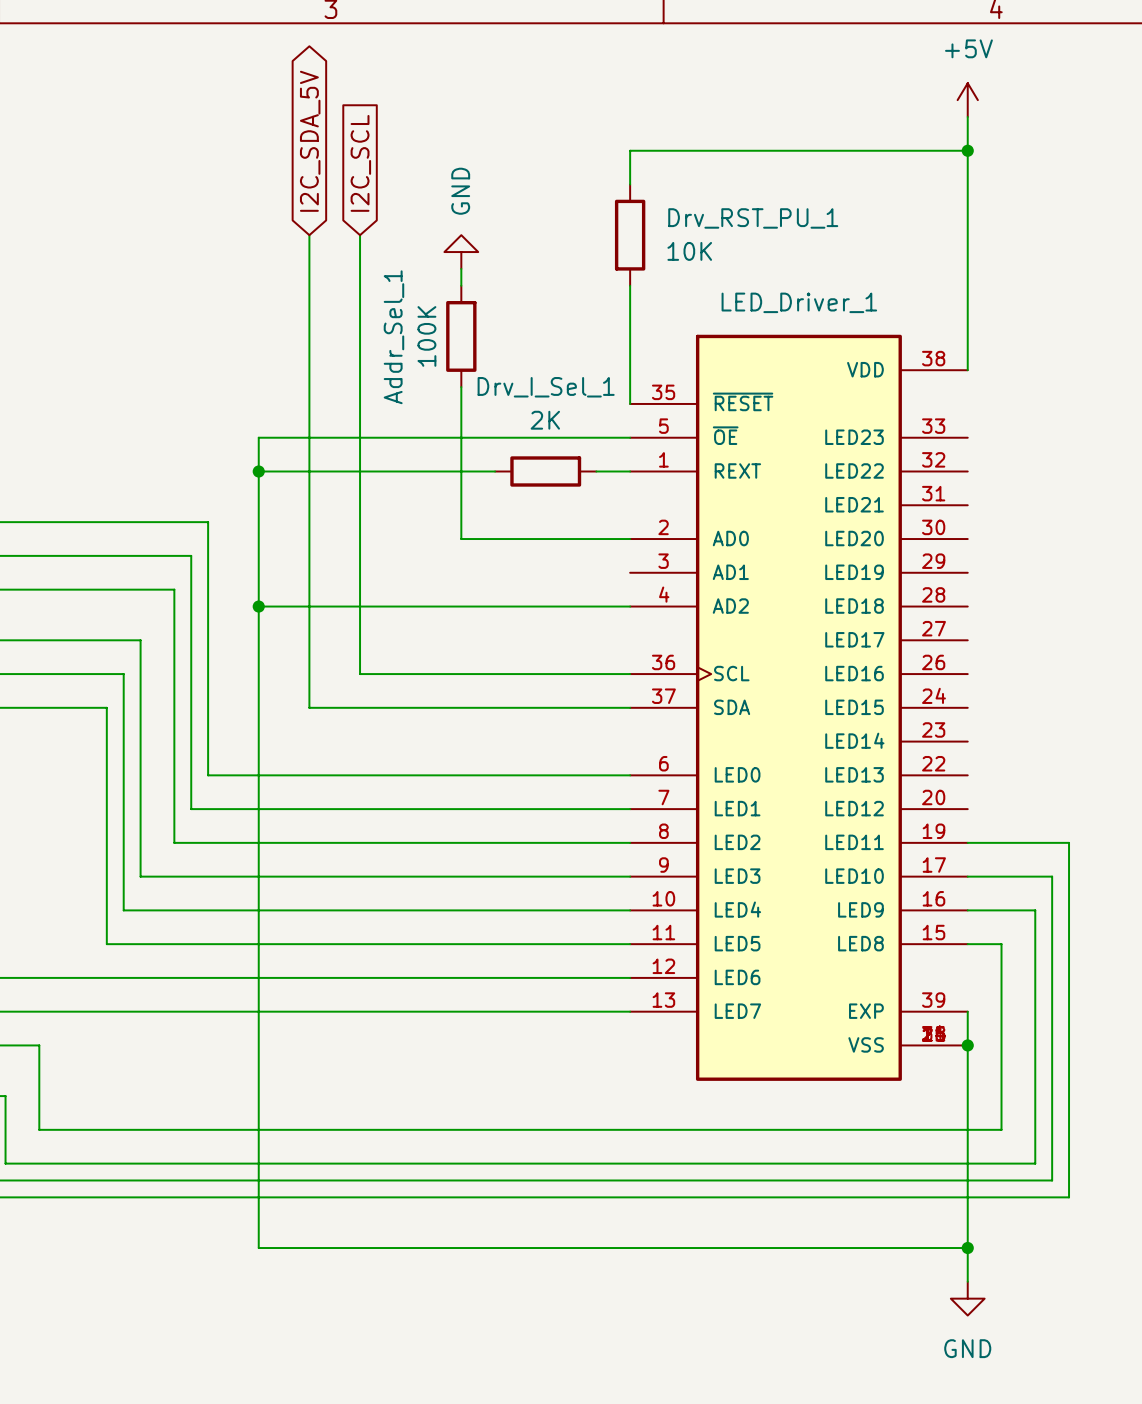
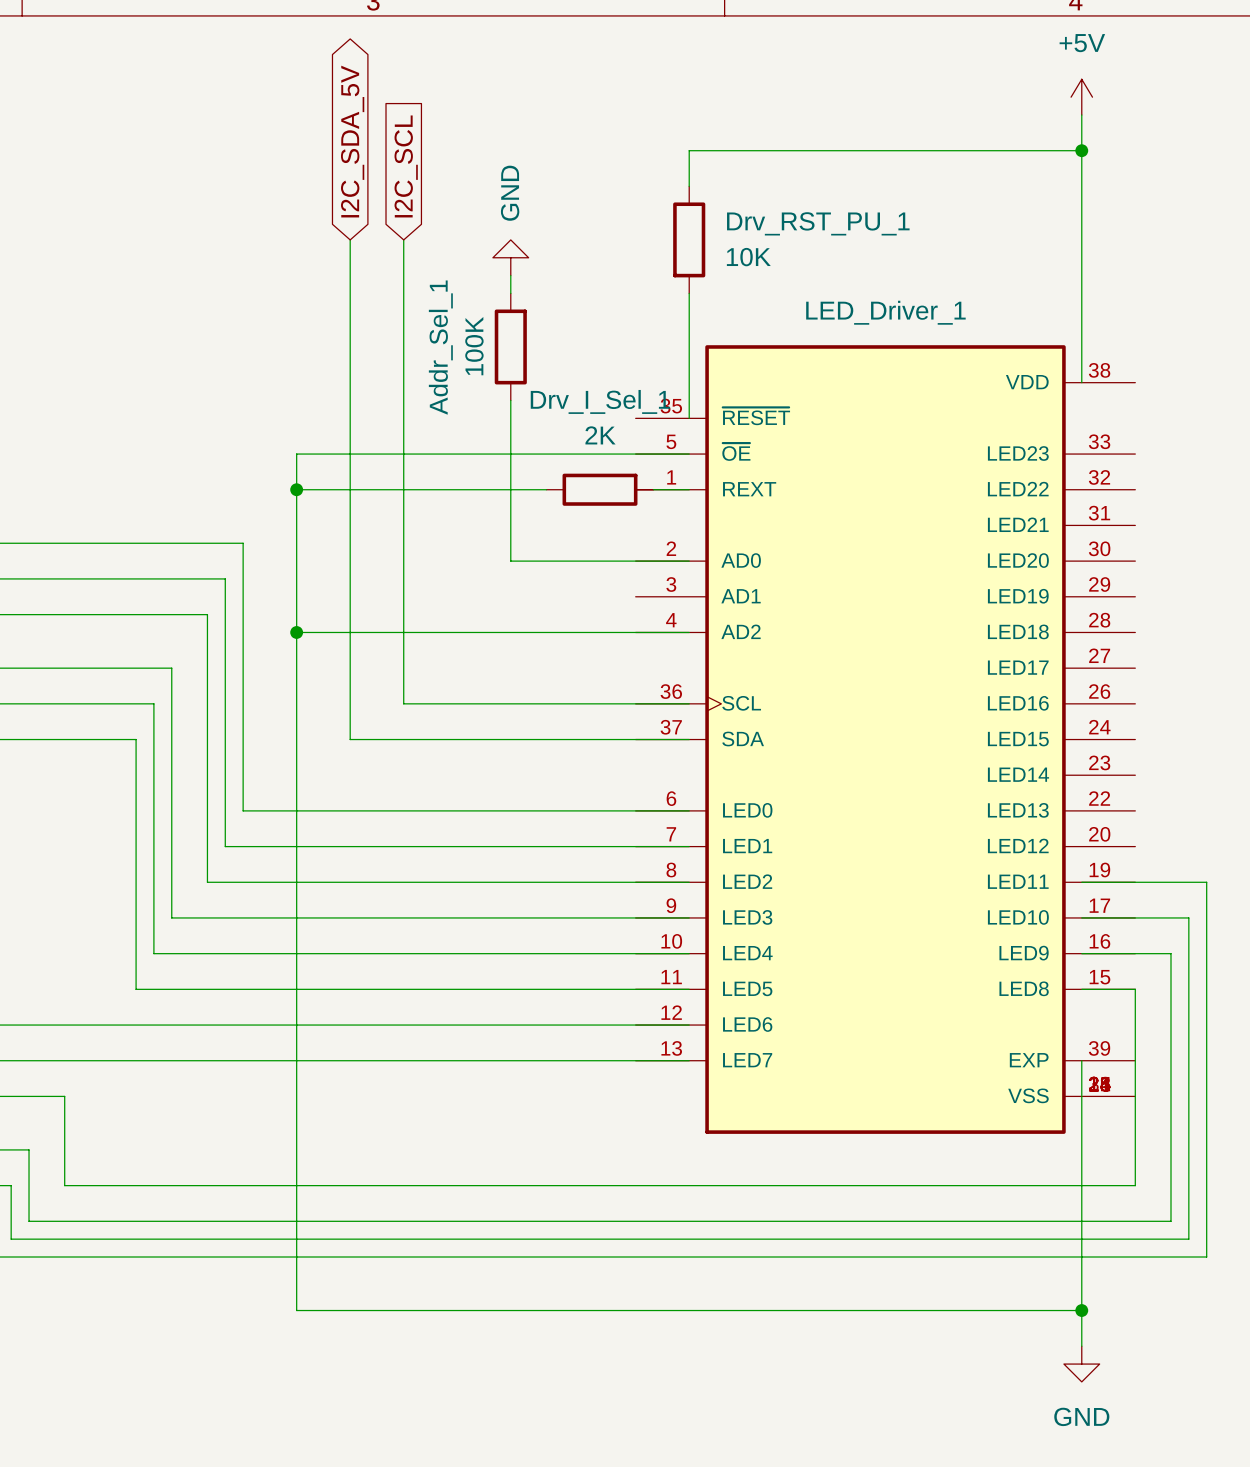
power symbol position: +5V (967, 100) -> +5V (1081, 97)
wire: (967, 117) (967, 370) -> (1081, 115) (1081, 382)
wire: none -> (1046, 150) (1081, 150)
junction position: (967, 150) -> (1081, 150)
LED_Driver_1 symbol: [630, 334, 968, 1081] -> [635, 345, 1136, 1134]
wire: (1069, 842) (1069, 1197) -> (1153, 882) (1206, 882) (1206, 1257) (1153, 1257)
wire: (1052, 876) (1052, 944) -> (1081, 989) (1135, 989)
wire: none -> (1135, 917) (1188, 917) (1188, 1239) (1135, 1239)
wire: (1035, 910) (1035, 1163) -> (1117, 953) (1170, 953) (1170, 1221) (1117, 1221)
wire: (967, 944) (1001, 944) (1001, 1011) -> none
wire: (967, 1011) (967, 1281) -> none
junction: (967, 1045) -> none
wire: (1052, 1129) (1052, 1180) -> (1135, 1185) (1081, 1185) (1081, 1346)
wire: none -> (1046, 1310) (1081, 1310)
junction position: (967, 1248) -> (1081, 1310)
power symbol position: GND (967, 1298) -> GND (1081, 1364)

